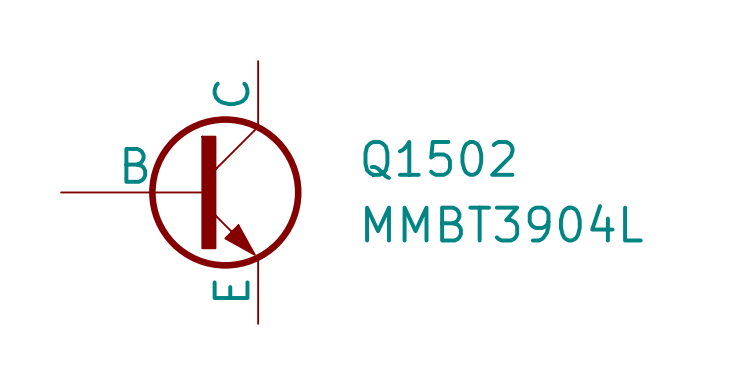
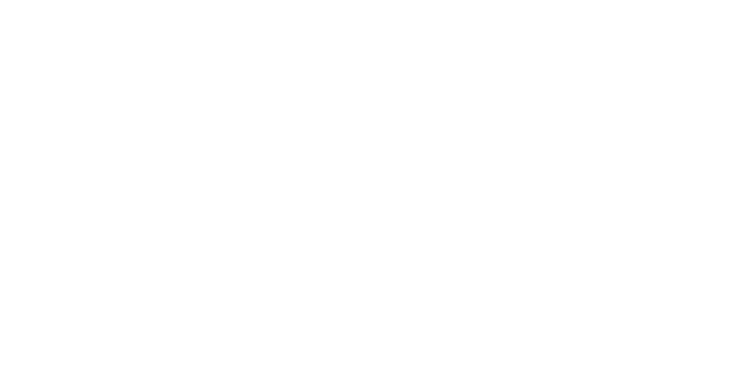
Q1502: MMBT3904L (181, 192) -> none

